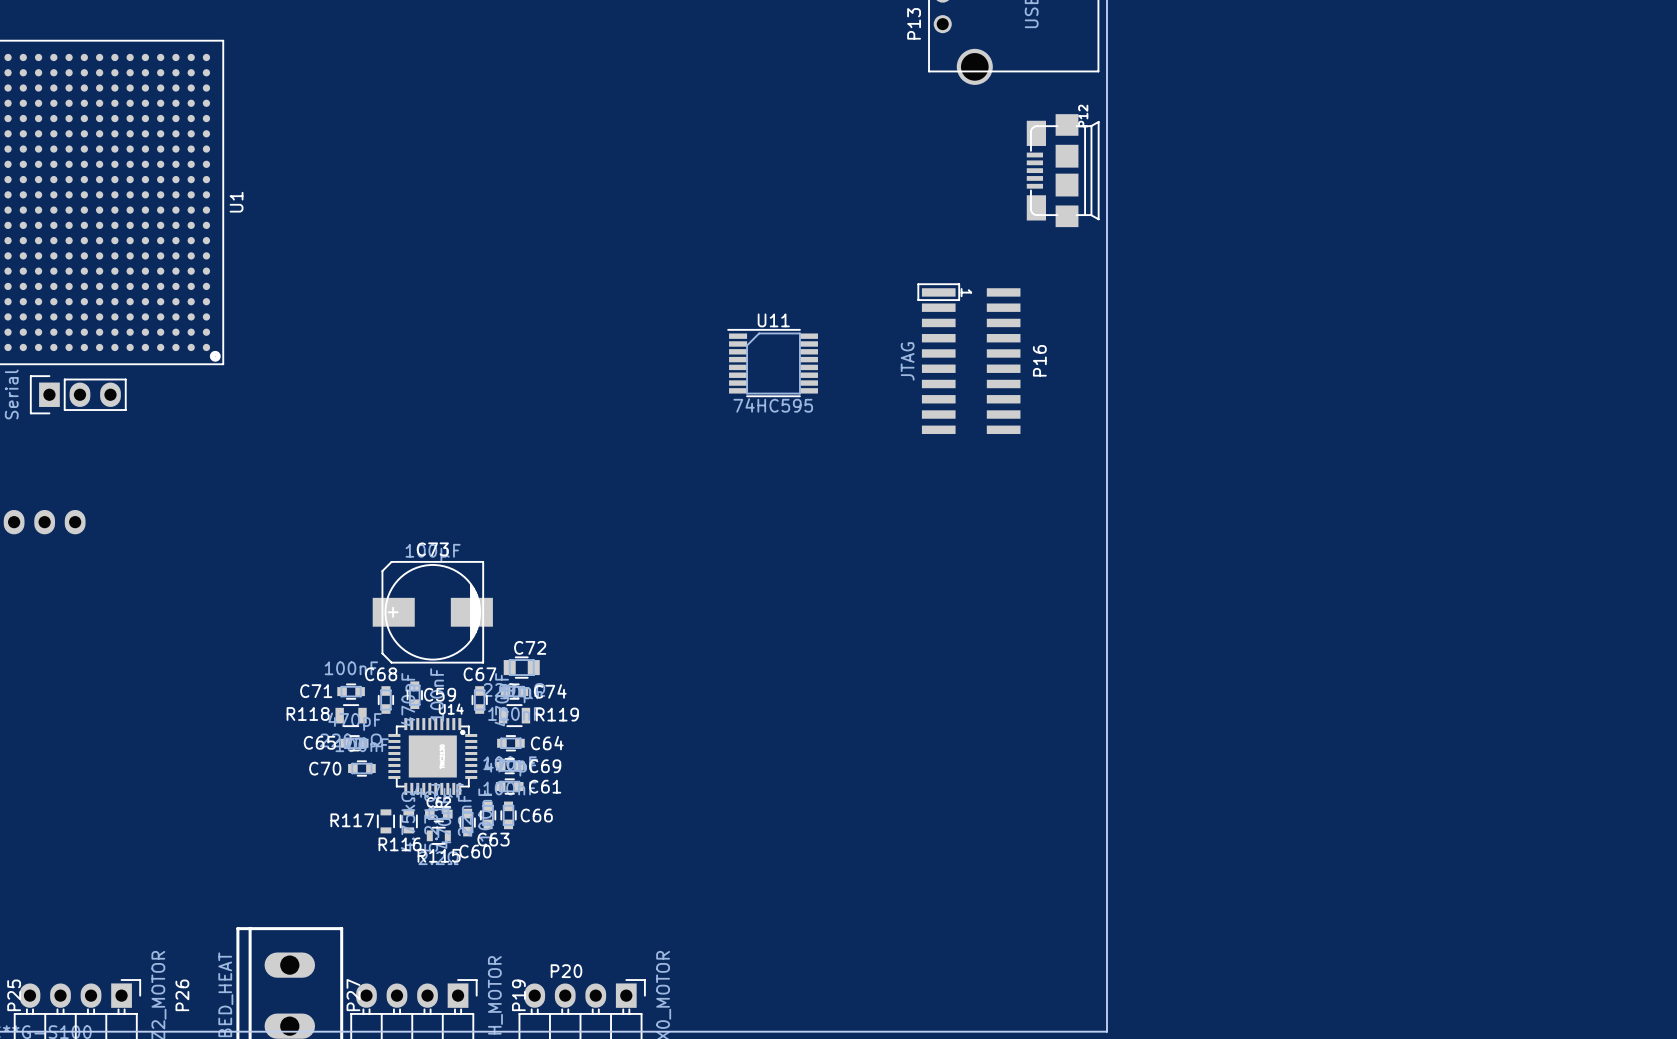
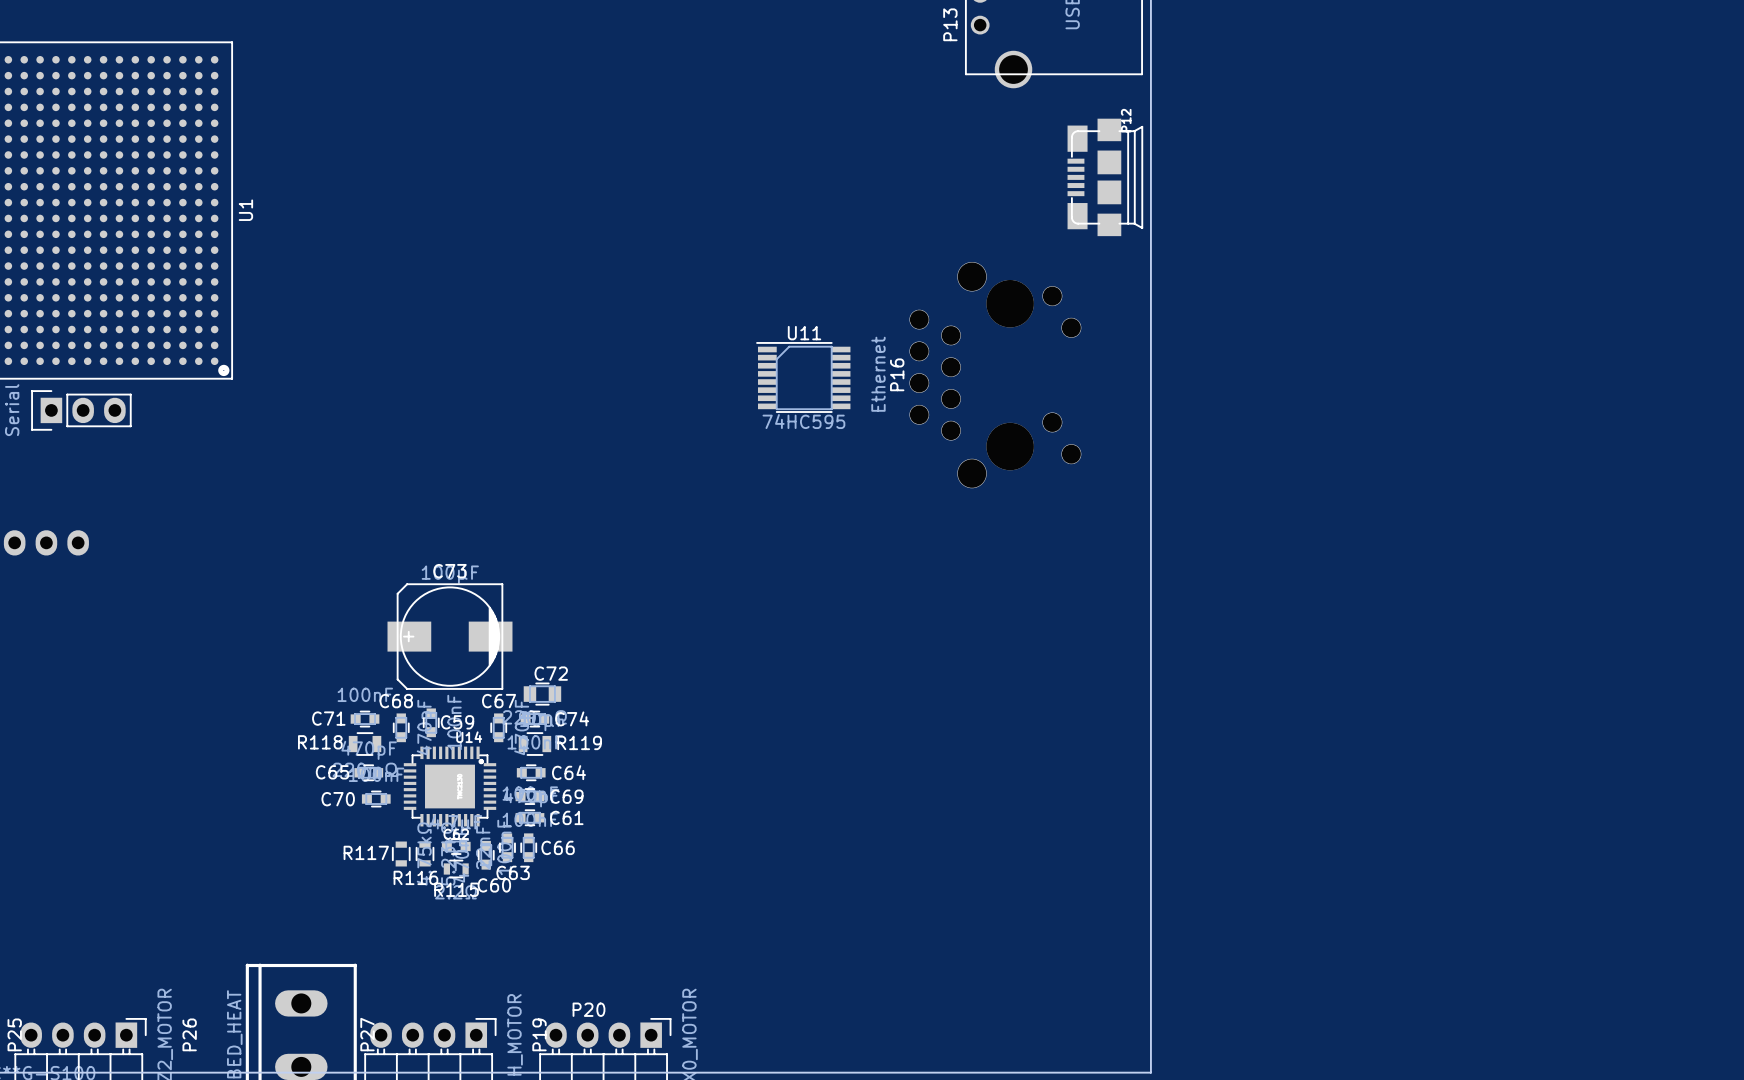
P16 footprint: [917, 283, 1021, 434] -> [909, 262, 1082, 489]
P16 name position: P16 (1039, 360) -> P16 (897, 374)
P16 value: JTAG (907, 361) -> Ethernet (878, 374)

